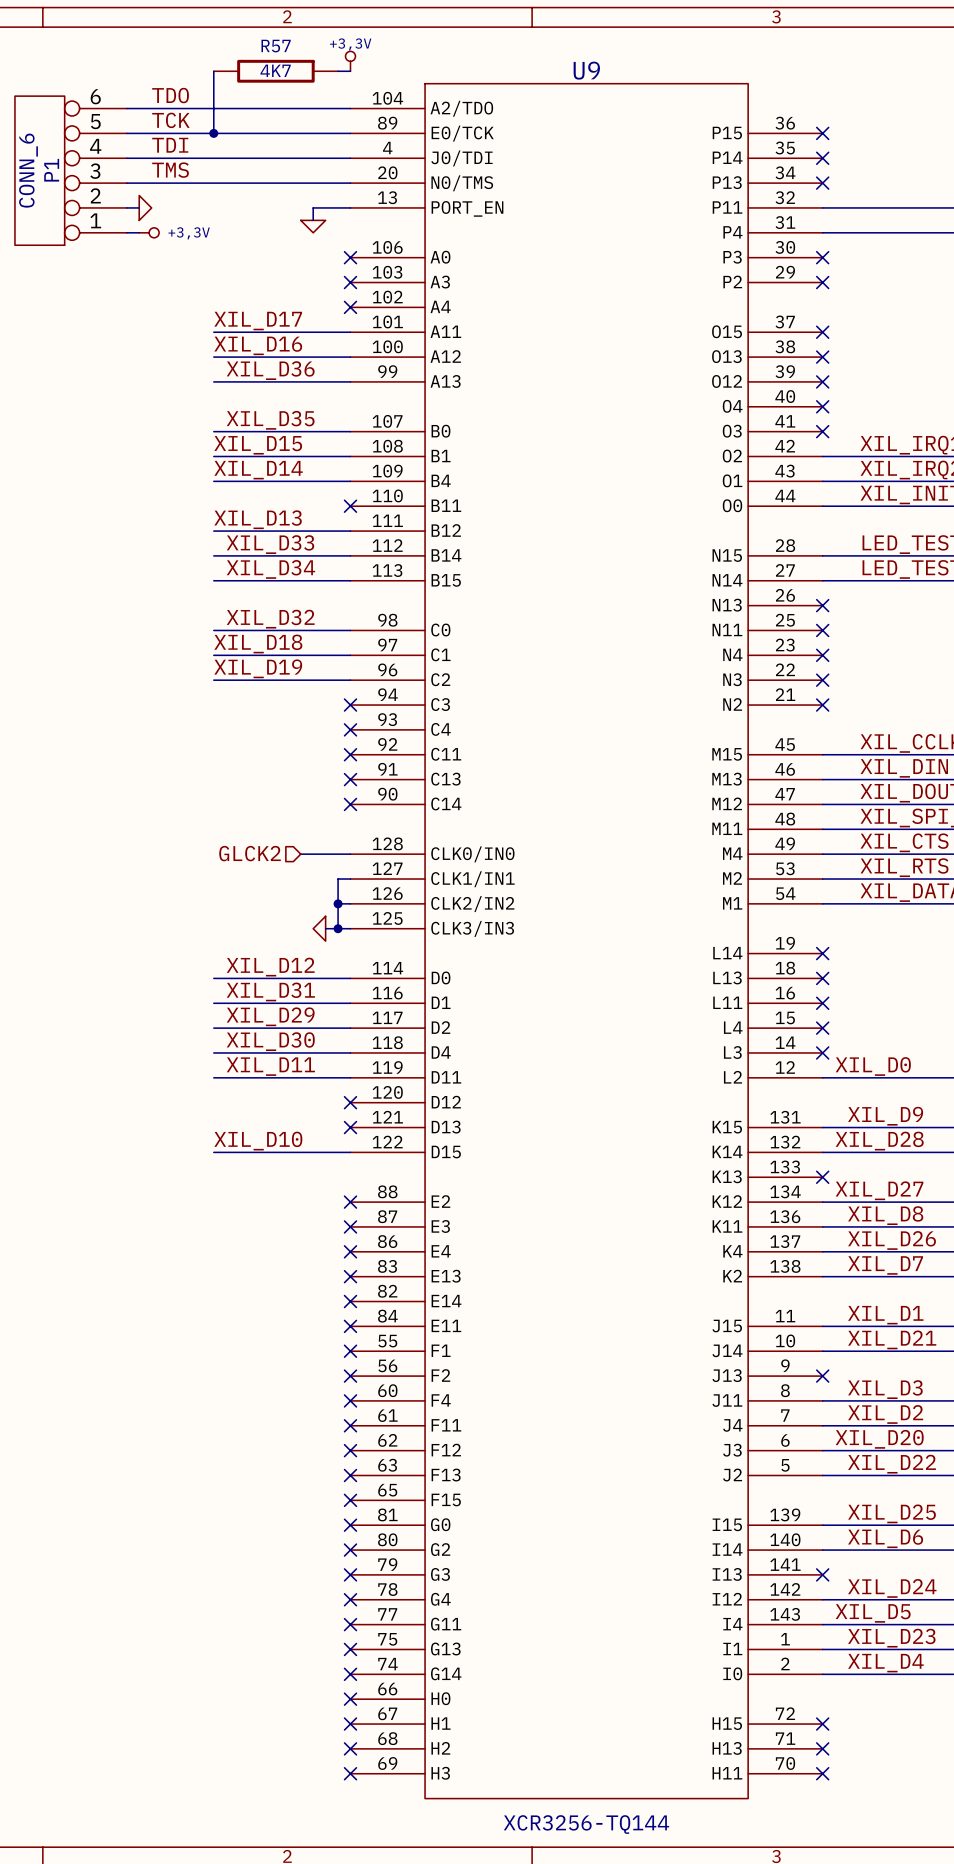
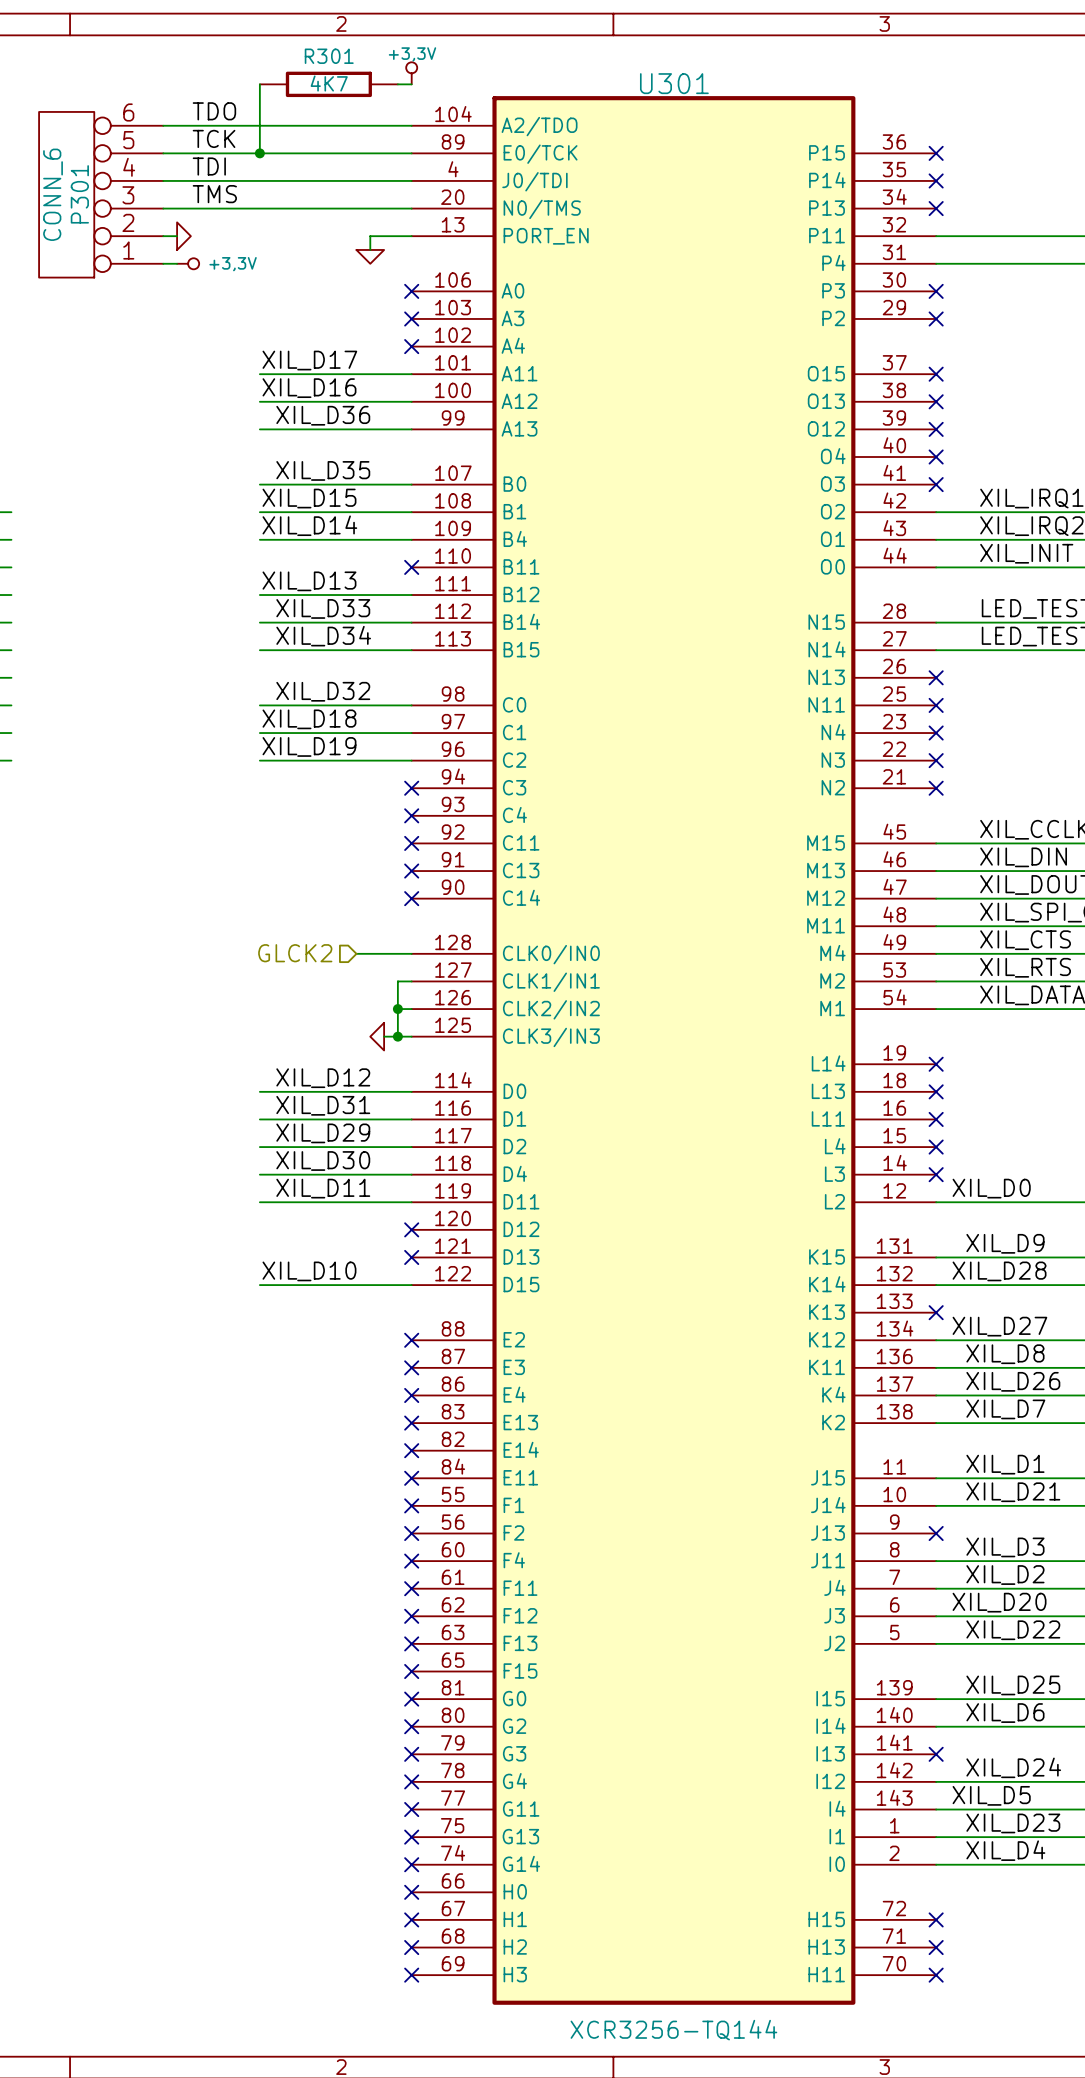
R57 name: R57 (276, 46) -> R301 (329, 56)
P1 name: P1 (51, 170) -> P301 (79, 194)
U9: XCR3256-TQ144 (586, 941) -> none
U301: none -> XCR3256-TQ144 (673, 1050)

